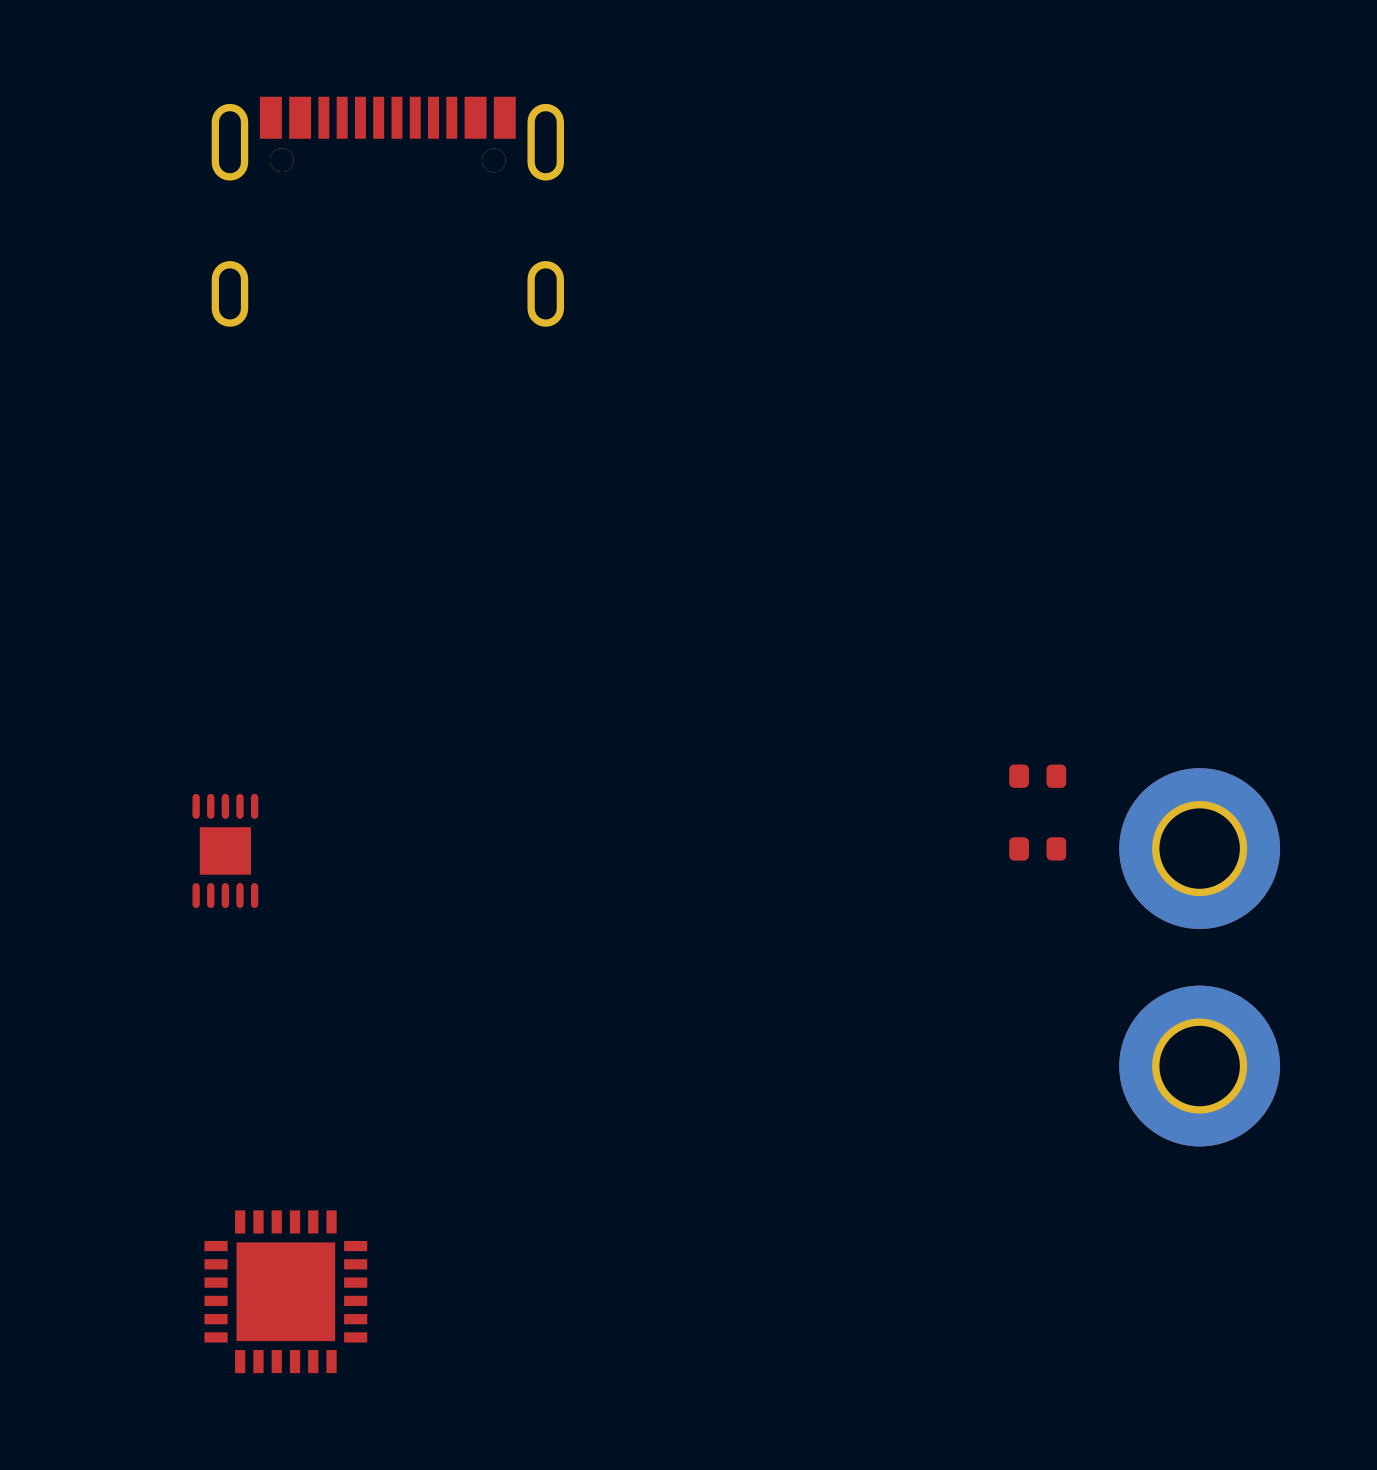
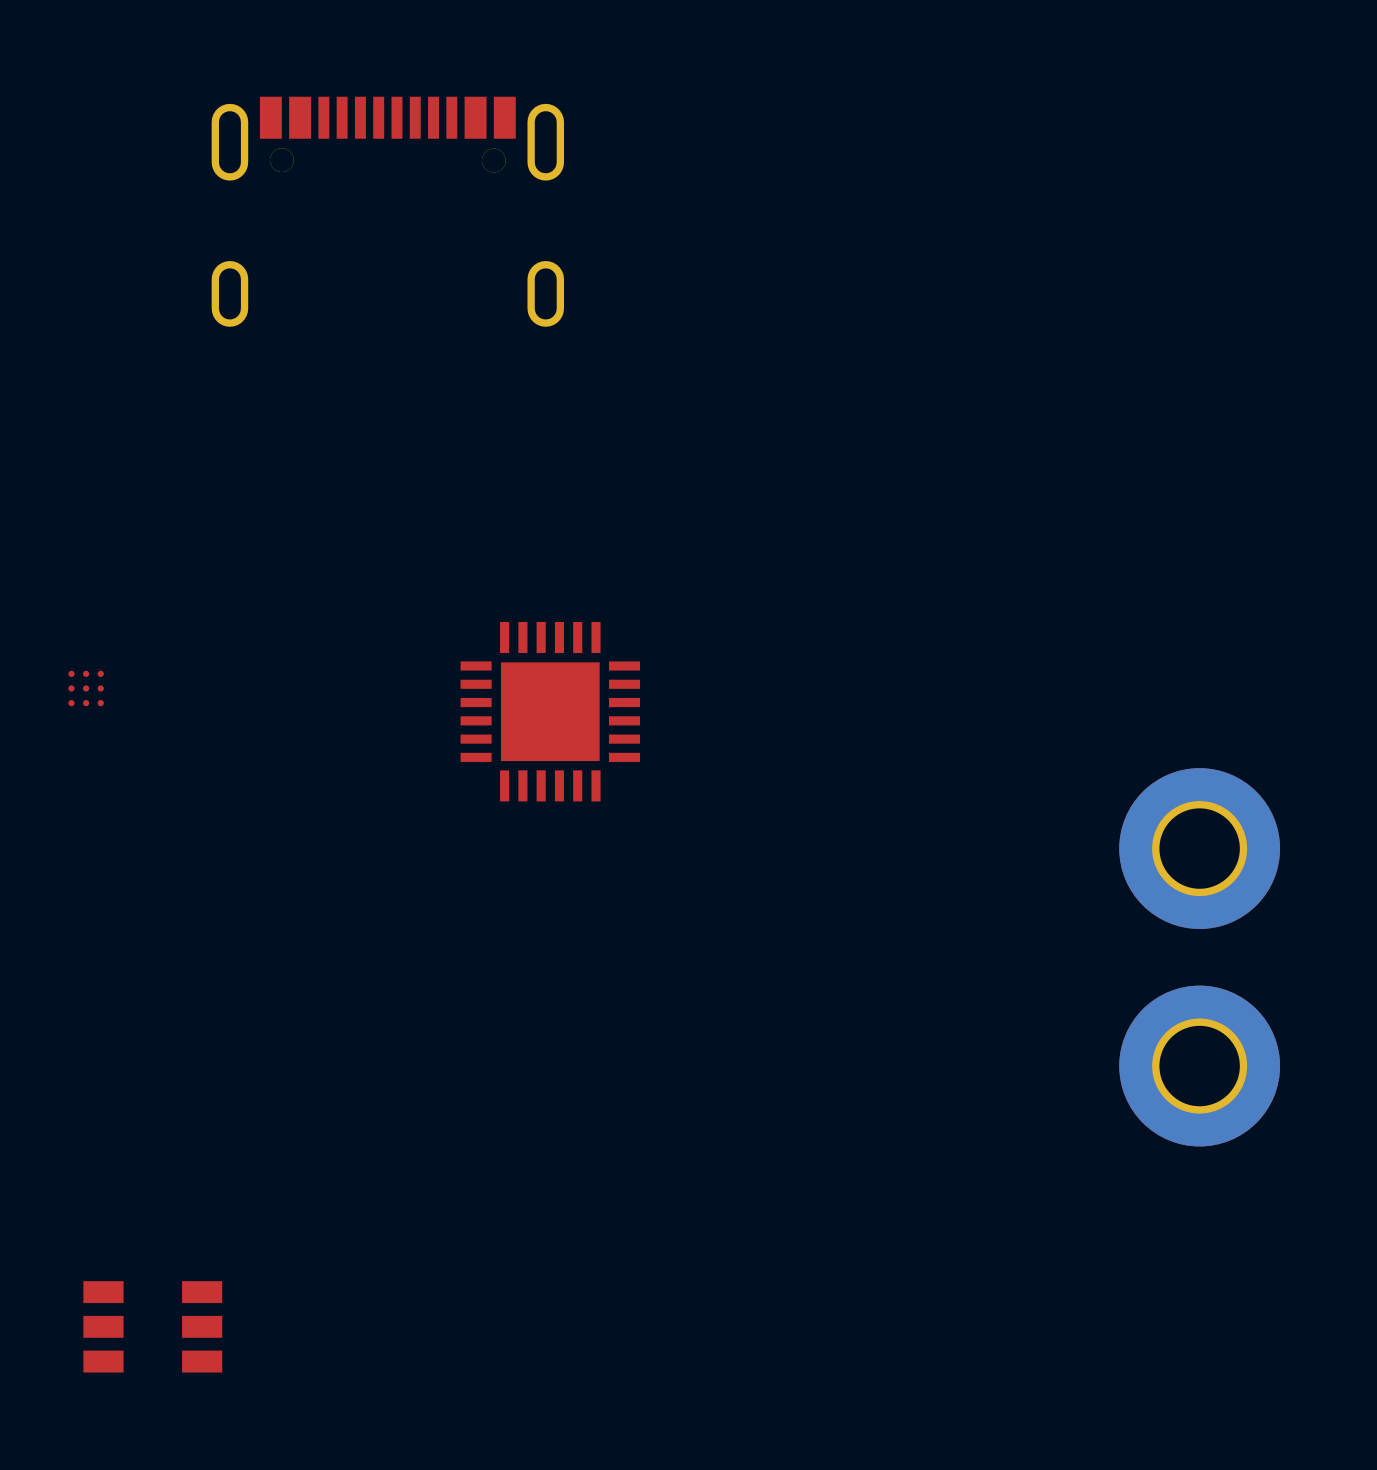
part: none -> (86, 688)
part: none -> (550, 711)
part: (1037, 776) -> none
part: (1037, 848) -> none
part: (225, 850) -> none
part: (285, 1291) -> none
part: none -> (152, 1326)

